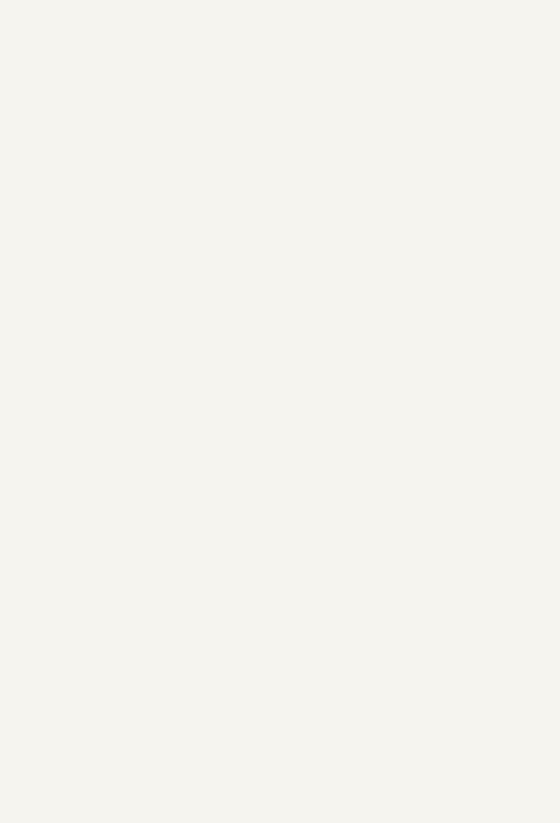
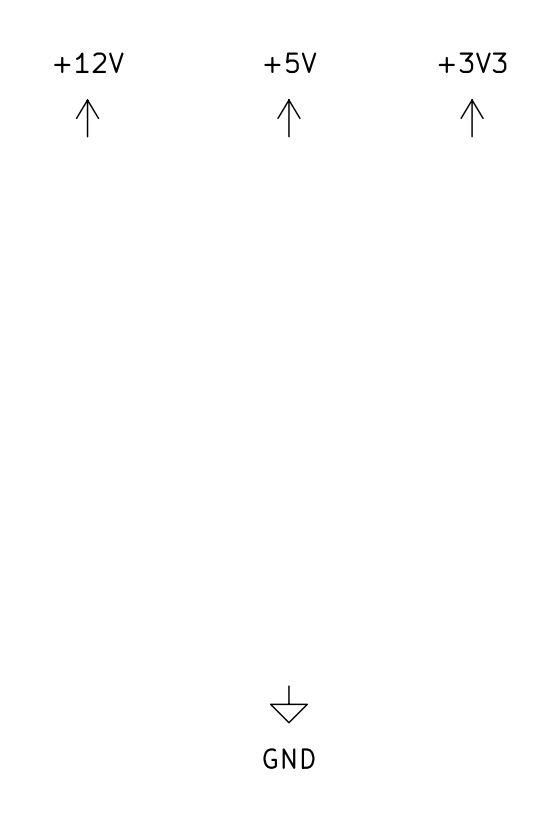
power symbol: none -> +12V (87, 118)
power symbol: none -> +5V (288, 118)
power symbol: none -> +3V3 (472, 118)
power symbol: none -> GND (288, 704)

